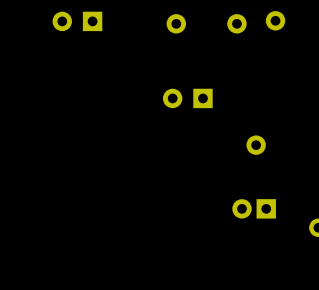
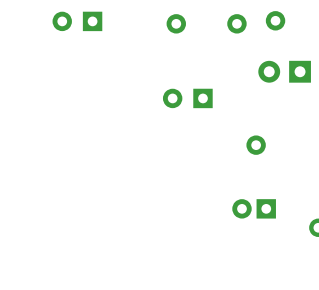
part: none -> (284, 71)

